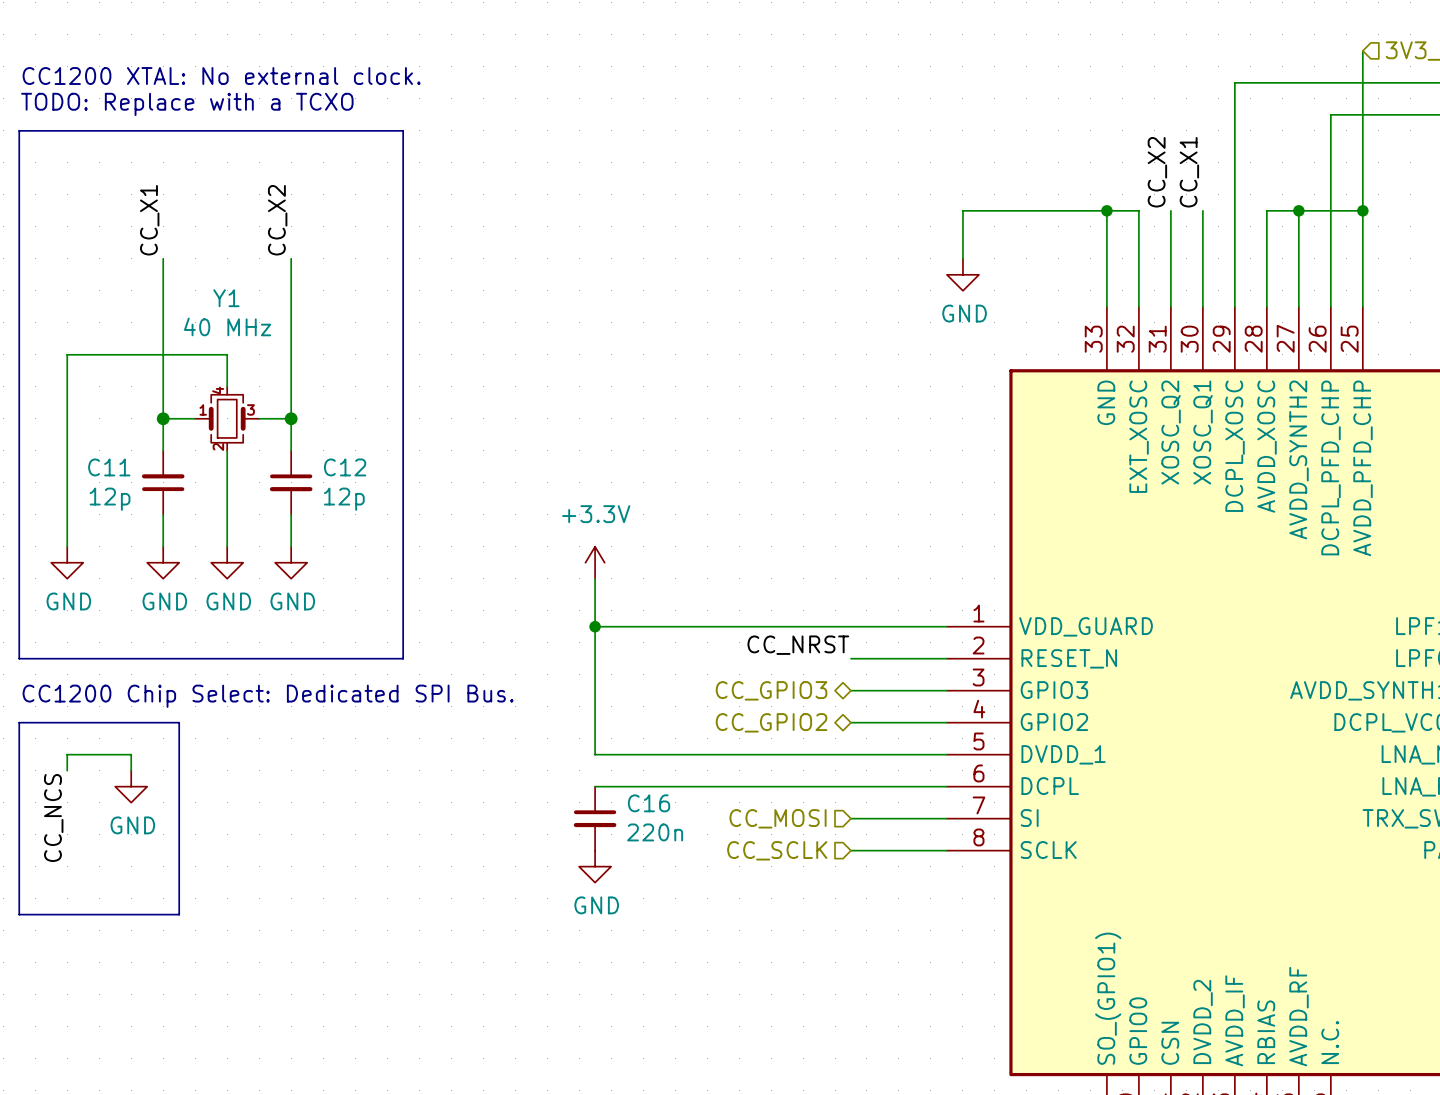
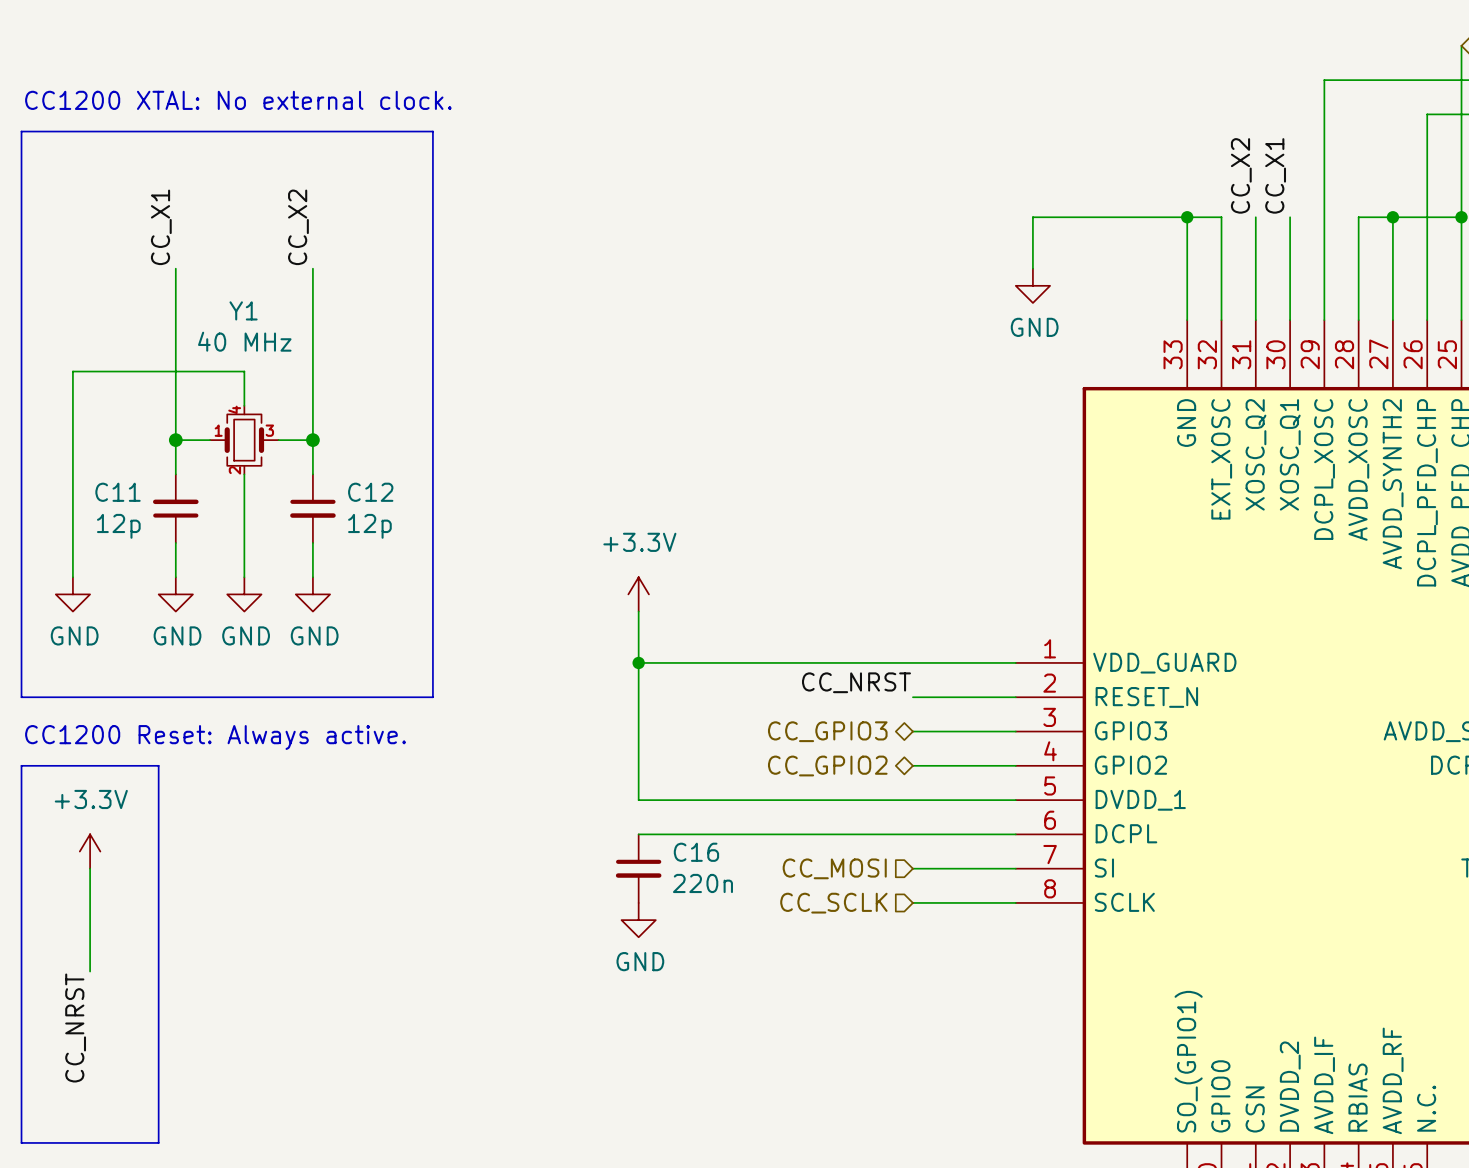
text: CC1200 XTAL: No external clock. (221, 76) -> none
text: TODO: Replace with a TCXO (187, 104) -> CC1200 XTAL: No external clock. (238, 100)
text: CC1200 Chip Select: Dedicated SPI Bus. (268, 696) -> CC1200 Reset: Always active. (215, 737)
line: (147, 722) (179, 722) (179, 914) (19, 914) -> (158, 765) (158, 1142) (21, 1142) (21, 971)
wire: (67, 770) (67, 754) (131, 754) (131, 770) -> none
power symbol: GND (131, 786) -> none
power symbol: none -> +3.3V (90, 851)
label: CC_NCS (53, 818) -> none
wire: none -> (90, 868) (90, 971)
label: none -> CC_NRST (75, 1027)

